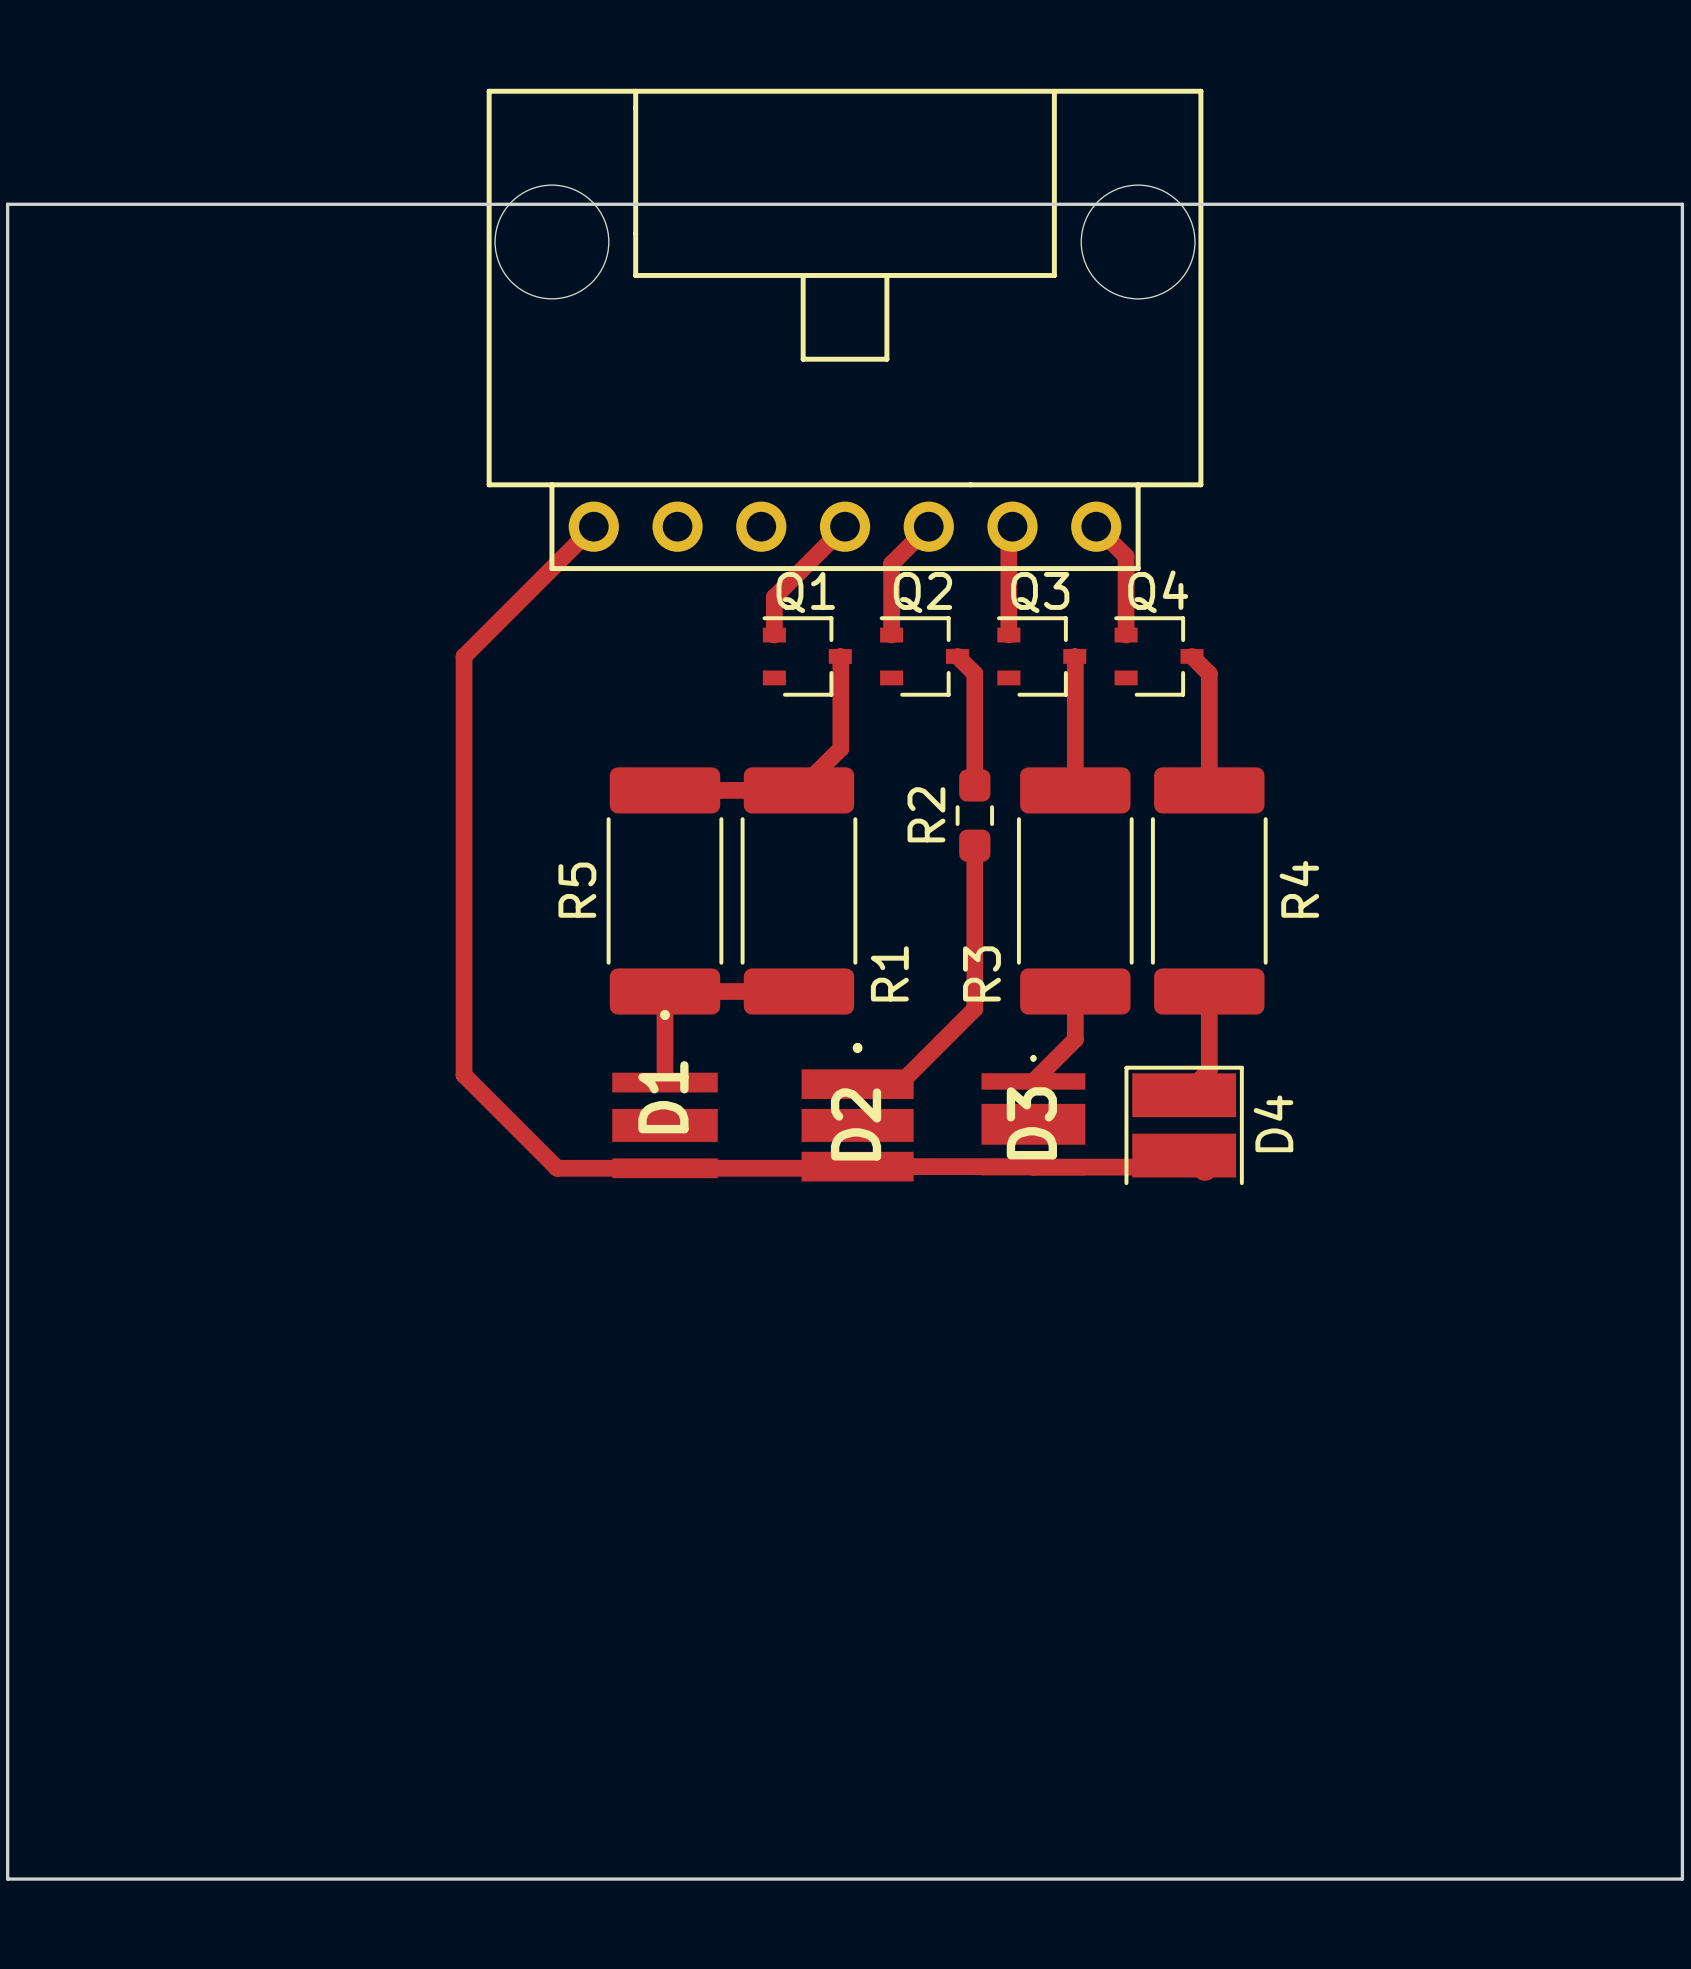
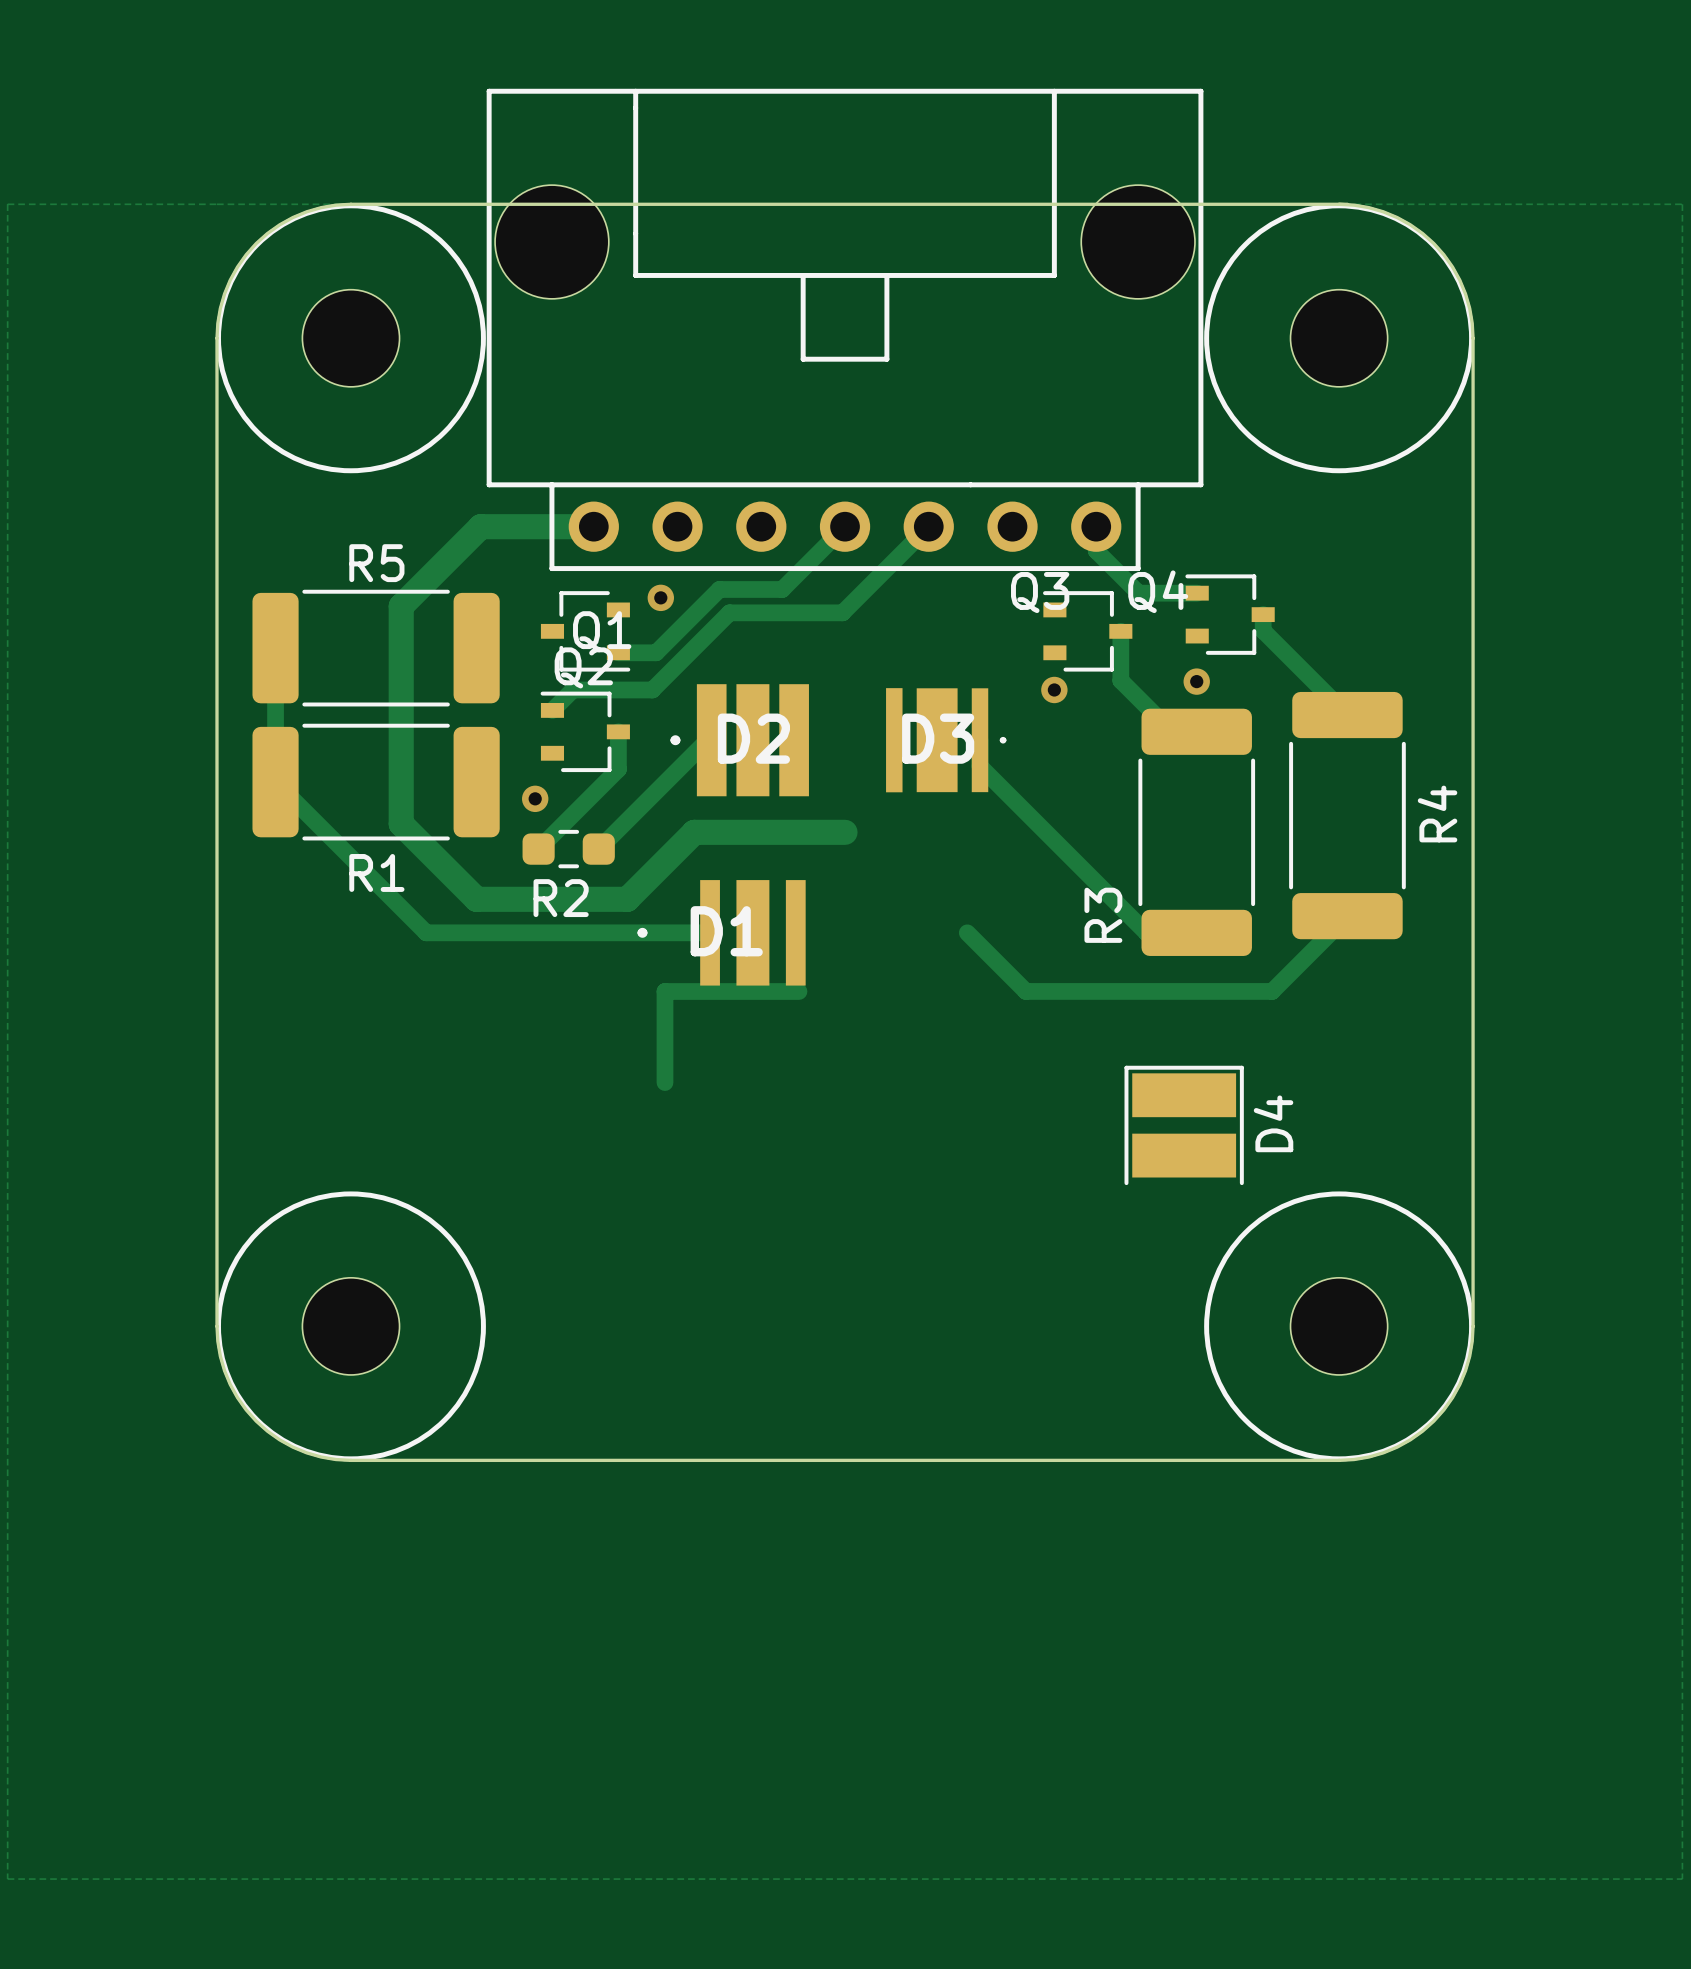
board edge: (350, 204) (7, 204) (7, 1879) (1682, 1879) (1682, 204) (1347, 204) -> (350, 204) (335, 205) (306, 211) (279, 224) (256, 243) (237, 266) (224, 294) (217, 323) (216, 338) (217, 1341) (224, 1370) (230, 1384) (246, 1409) (256, 1421) (279, 1439) (292, 1447) (321, 1457) (350, 1460) (1339, 1460) (1368, 1457) (1397, 1447) (1422, 1431) (1443, 1409) (1452, 1397) (1465, 1370) (1472, 1341) (1473, 1326) (1472, 323) (1469, 308) (1459, 280) (1443, 254) (1433, 243) (1410, 224) (1397, 217) (1368, 207) (1339, 204)
part: none -> (350, 338)
part: none -> (1339, 338)
track: (593, 526) (464, 656) (464, 1075) (557, 1168) (1172, 1167) (1184, 1155) (1192, 1155) (1204, 1168) -> (593, 526) (480, 526) (401, 606) (401, 823) (476, 899) (627, 899) (694, 832) (845, 832)
track: (1096, 526) (1126, 556) (1126, 635) -> (1096, 526) (1096, 550) (1138, 593) (1197, 593)
track: (1008, 530) (1008, 635) -> none
track: (891, 563) (891, 635) -> (891, 563) (842, 612) (729, 612) (652, 689) (572, 689) (552, 710)
track: (782, 589) (774, 597) (774, 635) -> (782, 589) (719, 589) (656, 652) (618, 652)
via: none -> (660, 597)
track: none -> (1263, 614) (1263, 630) (1347, 715)
track: none -> (1120, 631) (1120, 680) (1171, 731) (1196, 731)
track: none -> (275, 648) (275, 782) (426, 932) (710, 932)
Q1 rotation: 0° (807, 656) -> 180° (585, 631)
Q1 position: (807, 656) -> (585, 631)
track: (840, 656) (840, 748) (798, 790) (664, 790) -> none
Q2 position: (924, 656) -> (585, 731)
track: (957, 656) (974, 673) (974, 785) -> none
Q3 position: (1041, 656) -> (1087, 631)
track: (1074, 656) (1075, 790) -> none
Q4 position: (1158, 656) -> (1230, 614)
track: (1192, 656) (1209, 673) (1209, 790) -> none
via: none -> (1196, 681)
via: none -> (1054, 689)
track: none -> (618, 731) (618, 769) (538, 849)
track: none -> (711, 740) (707, 740) (598, 849)
track: none -> (980, 740) (980, 766) (1146, 932) (1196, 932)
via: none -> (535, 798)
R2 rotation: 0° (974, 815) -> 90° clockwise (568, 849)
R2 position: (974, 815) -> (568, 849)
track: (974, 845) (974, 1008) (899, 1084) (857, 1084) -> none
R5 rotation: 0° (664, 890) -> 90° clockwise (376, 648)
R5 position: (664, 890) -> (376, 648)
R1 rotation: 0° (798, 890) -> 90° clockwise (376, 782)
R1 position: (798, 890) -> (376, 782)
R3 position: (1075, 890) -> (1196, 832)
R4 position: (1209, 890) -> (1347, 815)
track: none -> (1347, 916) (1272, 991) (1025, 991) (967, 932)
R1 name position: R1 (889, 973) -> R1 (376, 872)
track: (1075, 991) (1075, 1039) (1033, 1081) -> none
track: (1209, 991) (1209, 1070) (1184, 1095) -> none
D1 rotation: 0° (664, 1094) -> 90° counterclockwise (721, 932)
D1 position: (664, 1094) -> (721, 932)
D2 rotation: 0° (857, 1112) -> 90° counterclockwise (739, 740)
D2 position: (857, 1112) -> (739, 740)
D3 rotation: 0° (1033, 1115) -> 90° clockwise (946, 740)
D3 position: (1033, 1115) -> (946, 740)
part: none -> (350, 1326)
part: none -> (1339, 1326)

